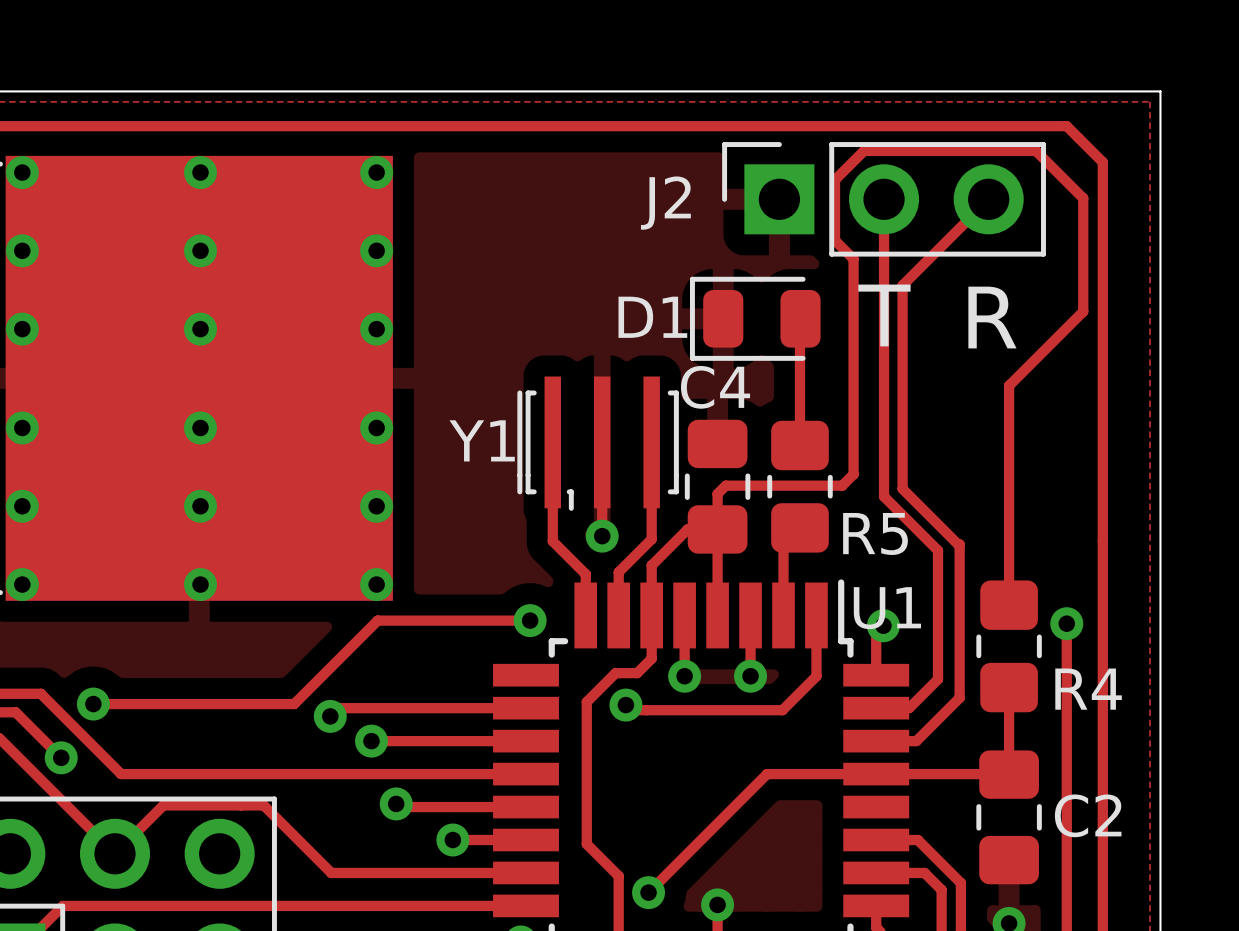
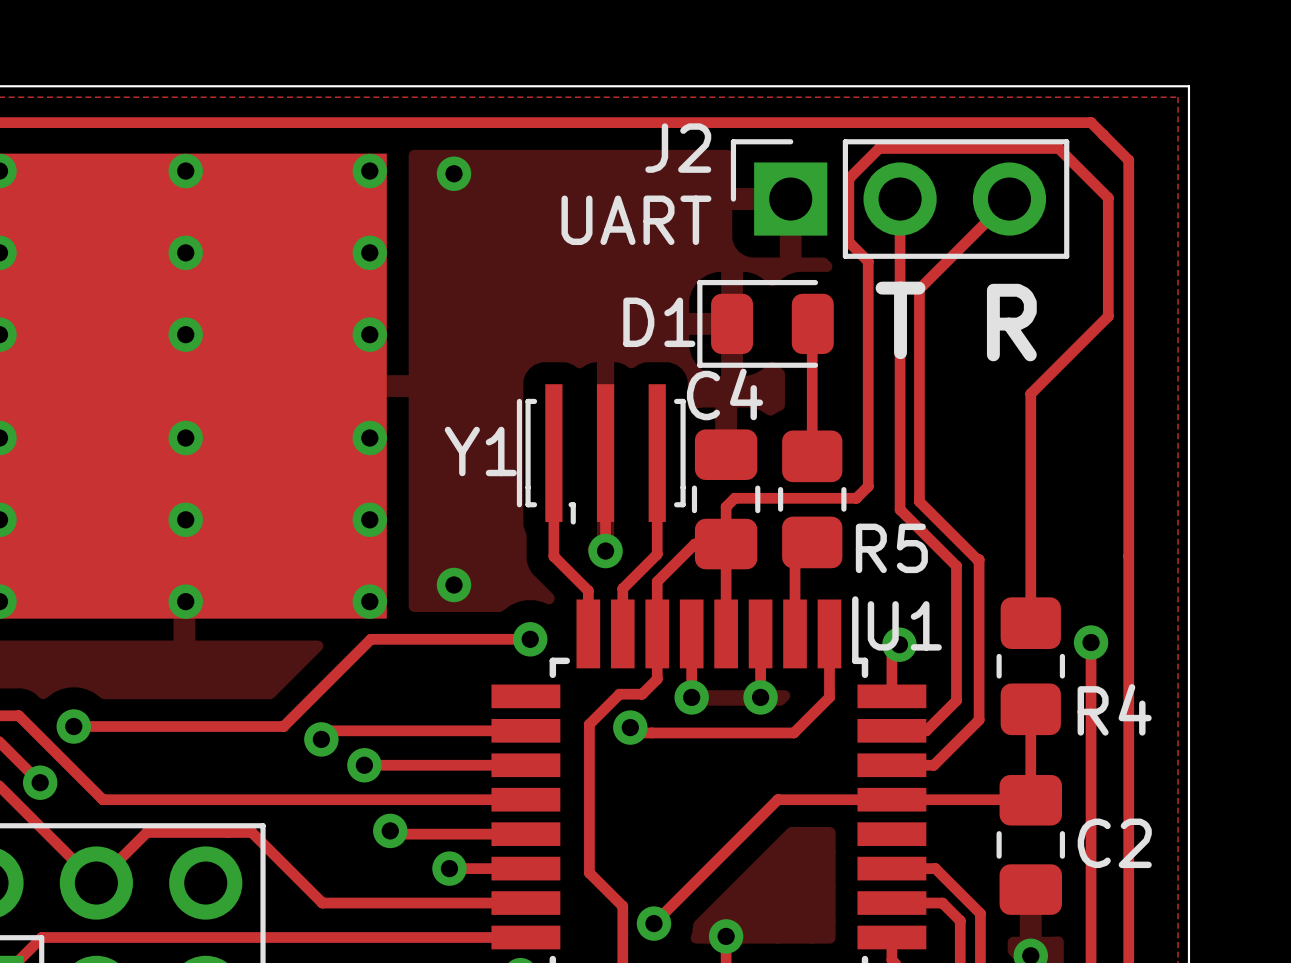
via: none -> (454, 173)
J2 name position: J2 (665, 203) -> J2 (678, 148)
J2 value: none -> UART (636, 220)
via: none -> (454, 584)

